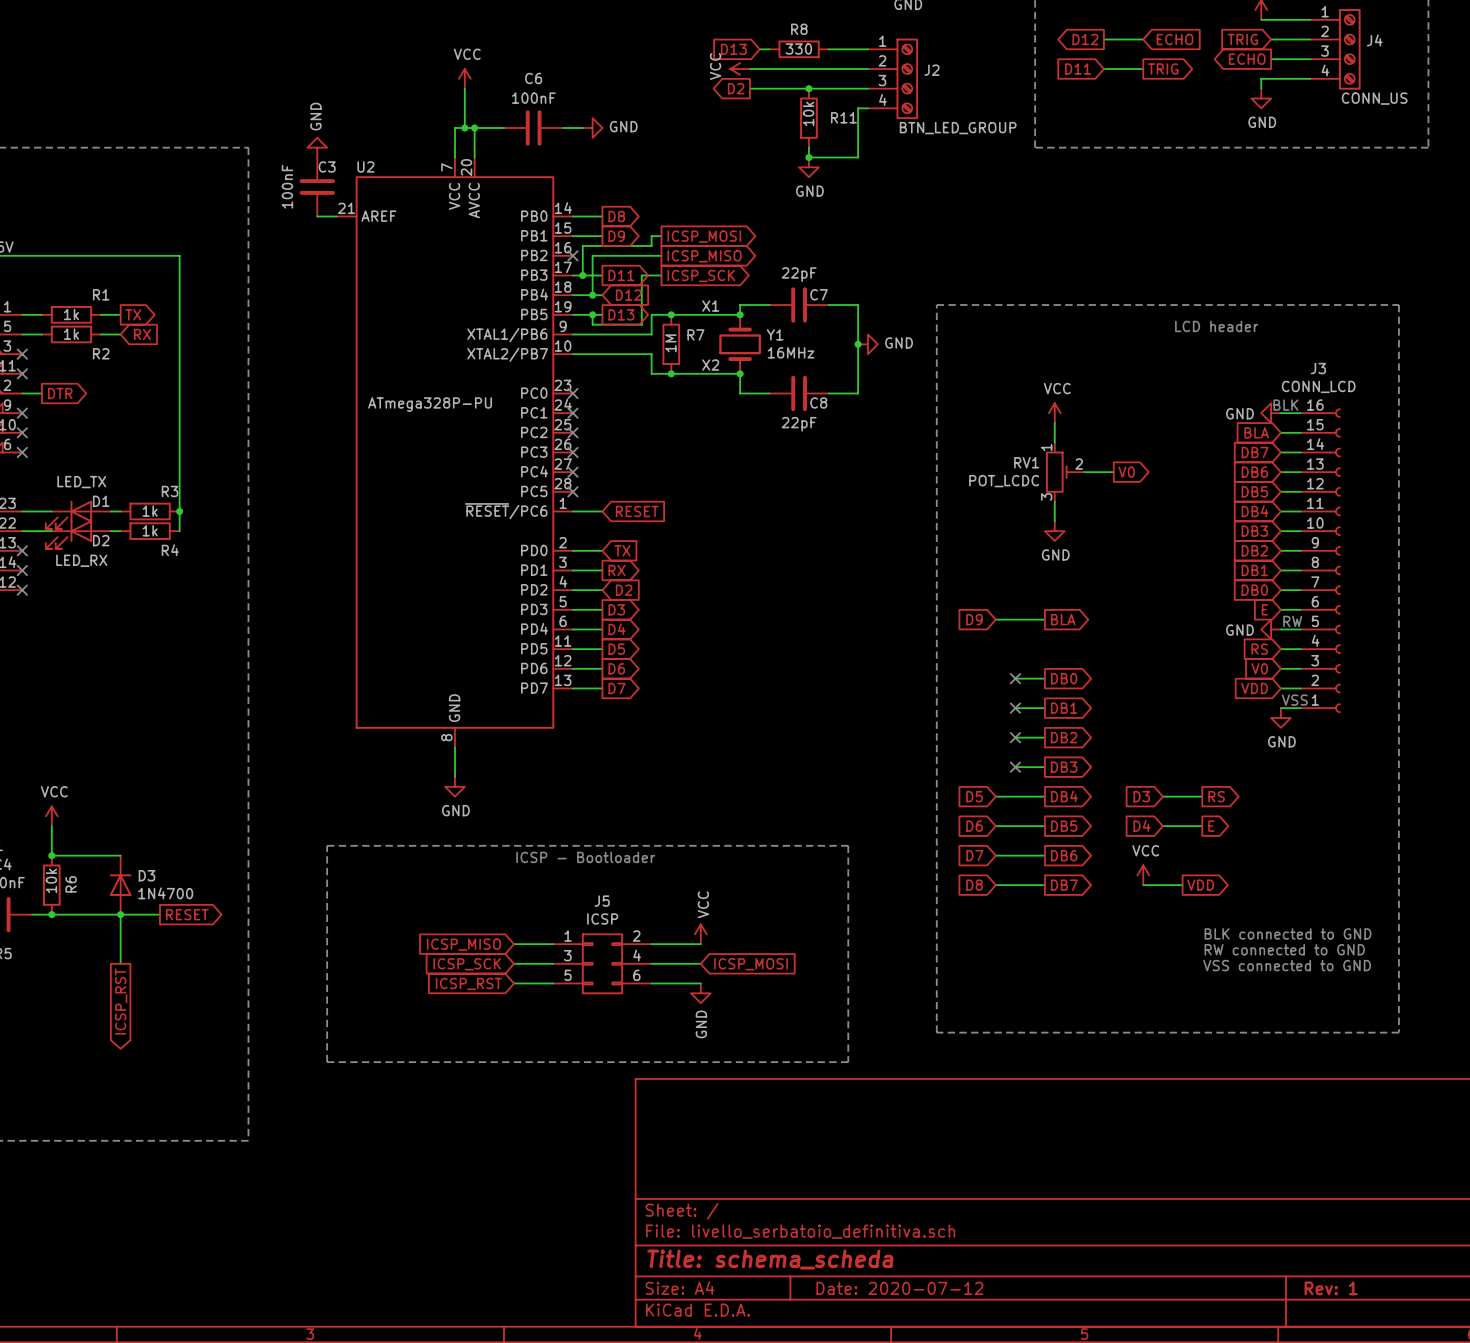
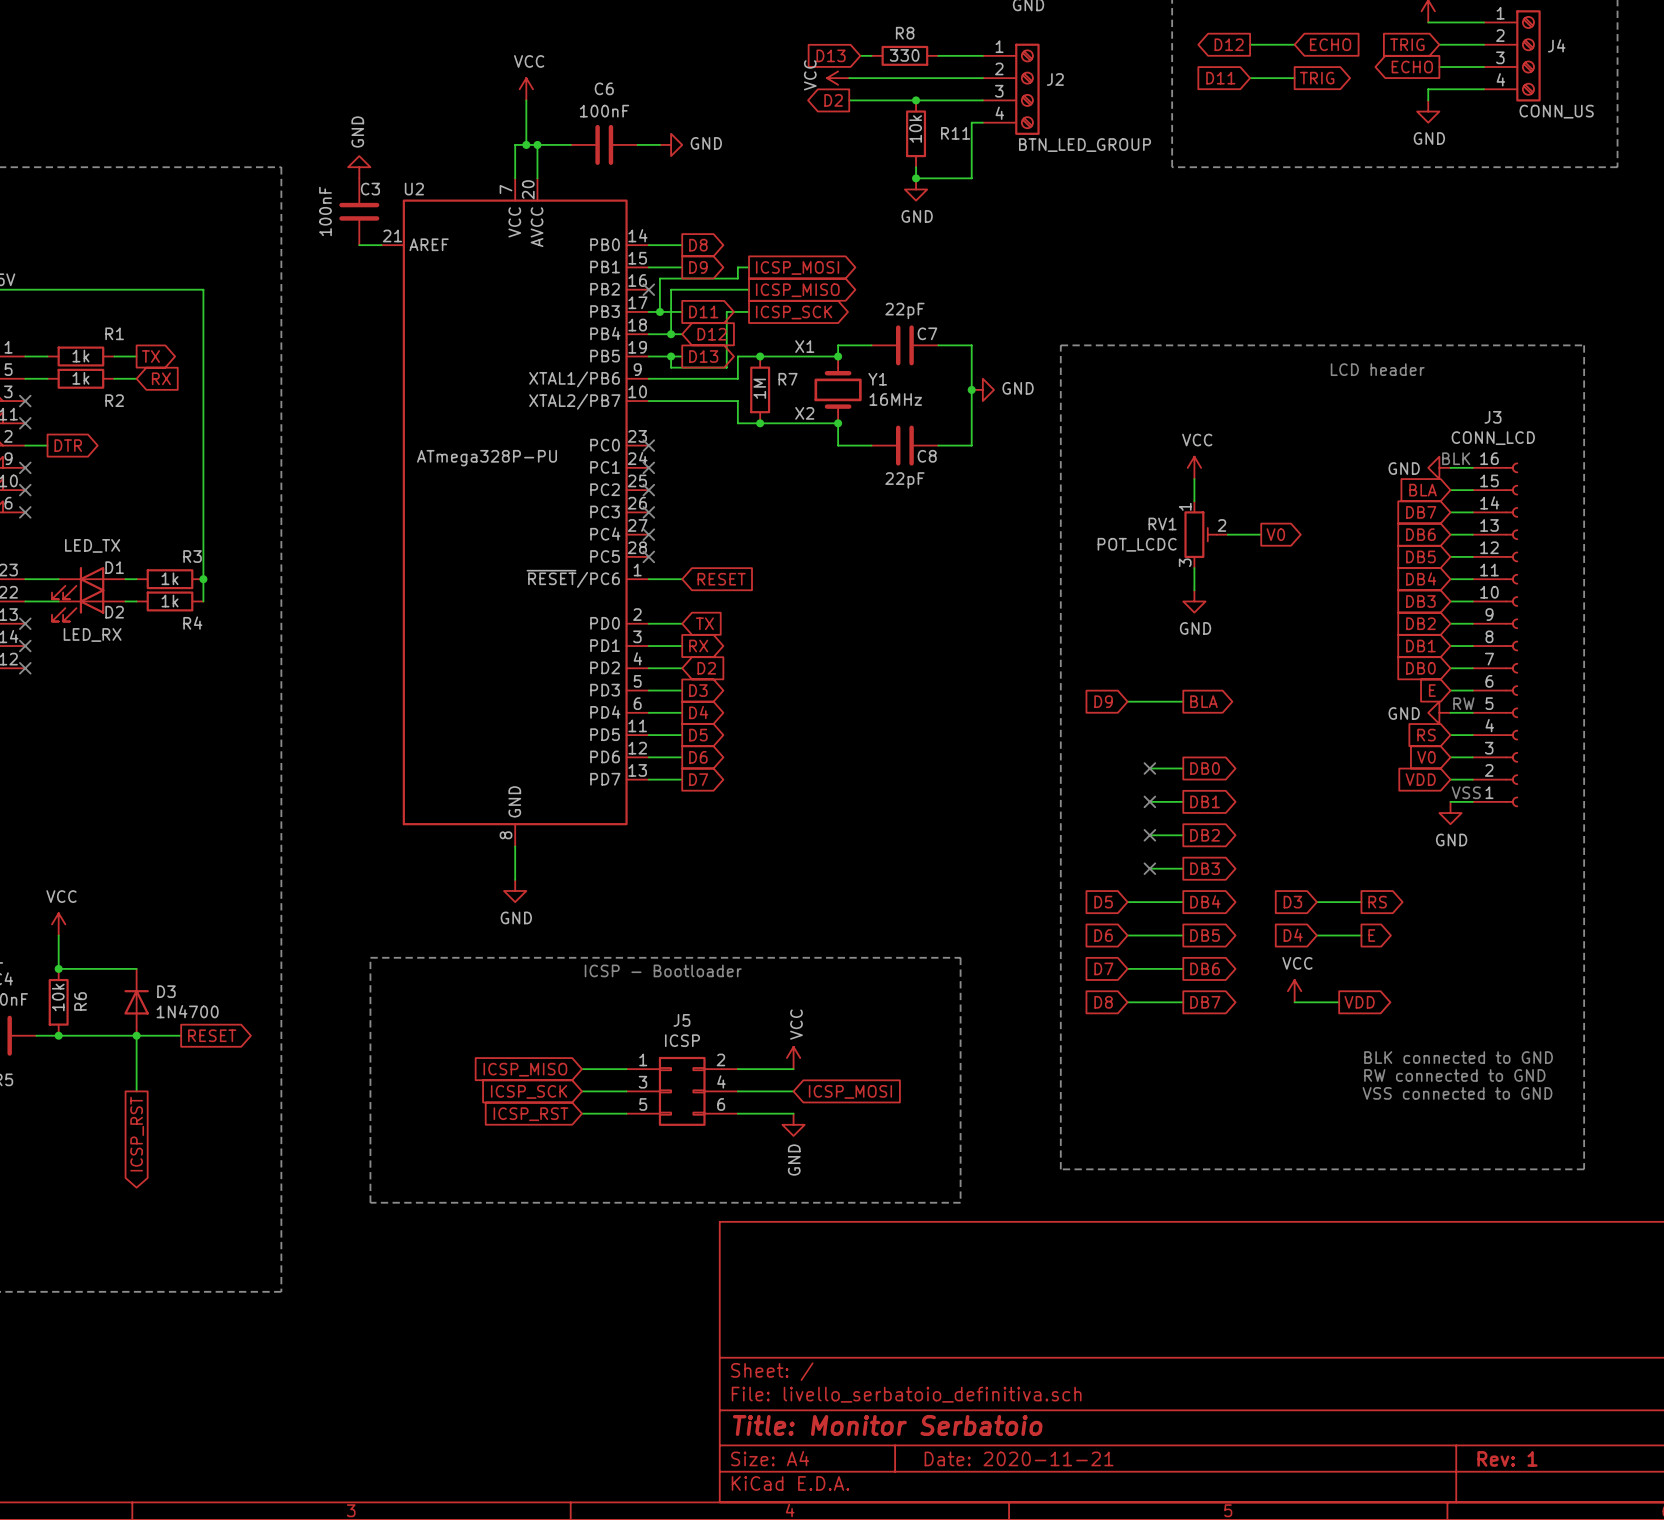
title block: Title: schema_scheda (770, 1259) -> Title: Monitor Serbatoio (887, 1425)
title block: Date: 2020-07-12 (899, 1288) -> Date: 2020-11-21 (1019, 1458)

